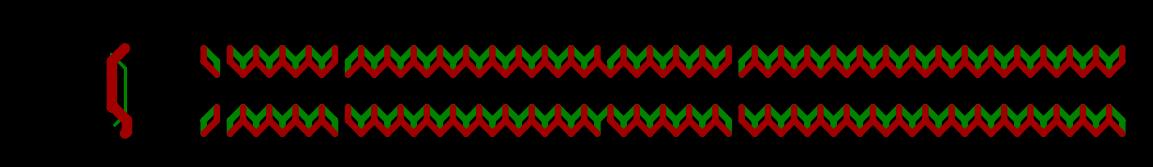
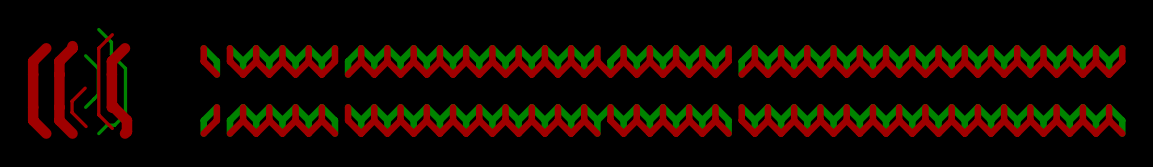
bottom track: none -> (98, 29) (111, 42) (111, 54)
top track: none -> (112, 34) (98, 48) (98, 114) (112, 128)
top track: none -> (72, 46) (59, 61) (59, 120) (72, 133)
top track: none -> (46, 48) (33, 61) (33, 120) (46, 133)
bottom track: none -> (85, 55) (98, 68) (98, 94) (85, 107)
top track: none -> (85, 88) (72, 101) (72, 112) (86, 126)
bottom track: none -> (114, 125) (107, 125) (98, 133)

